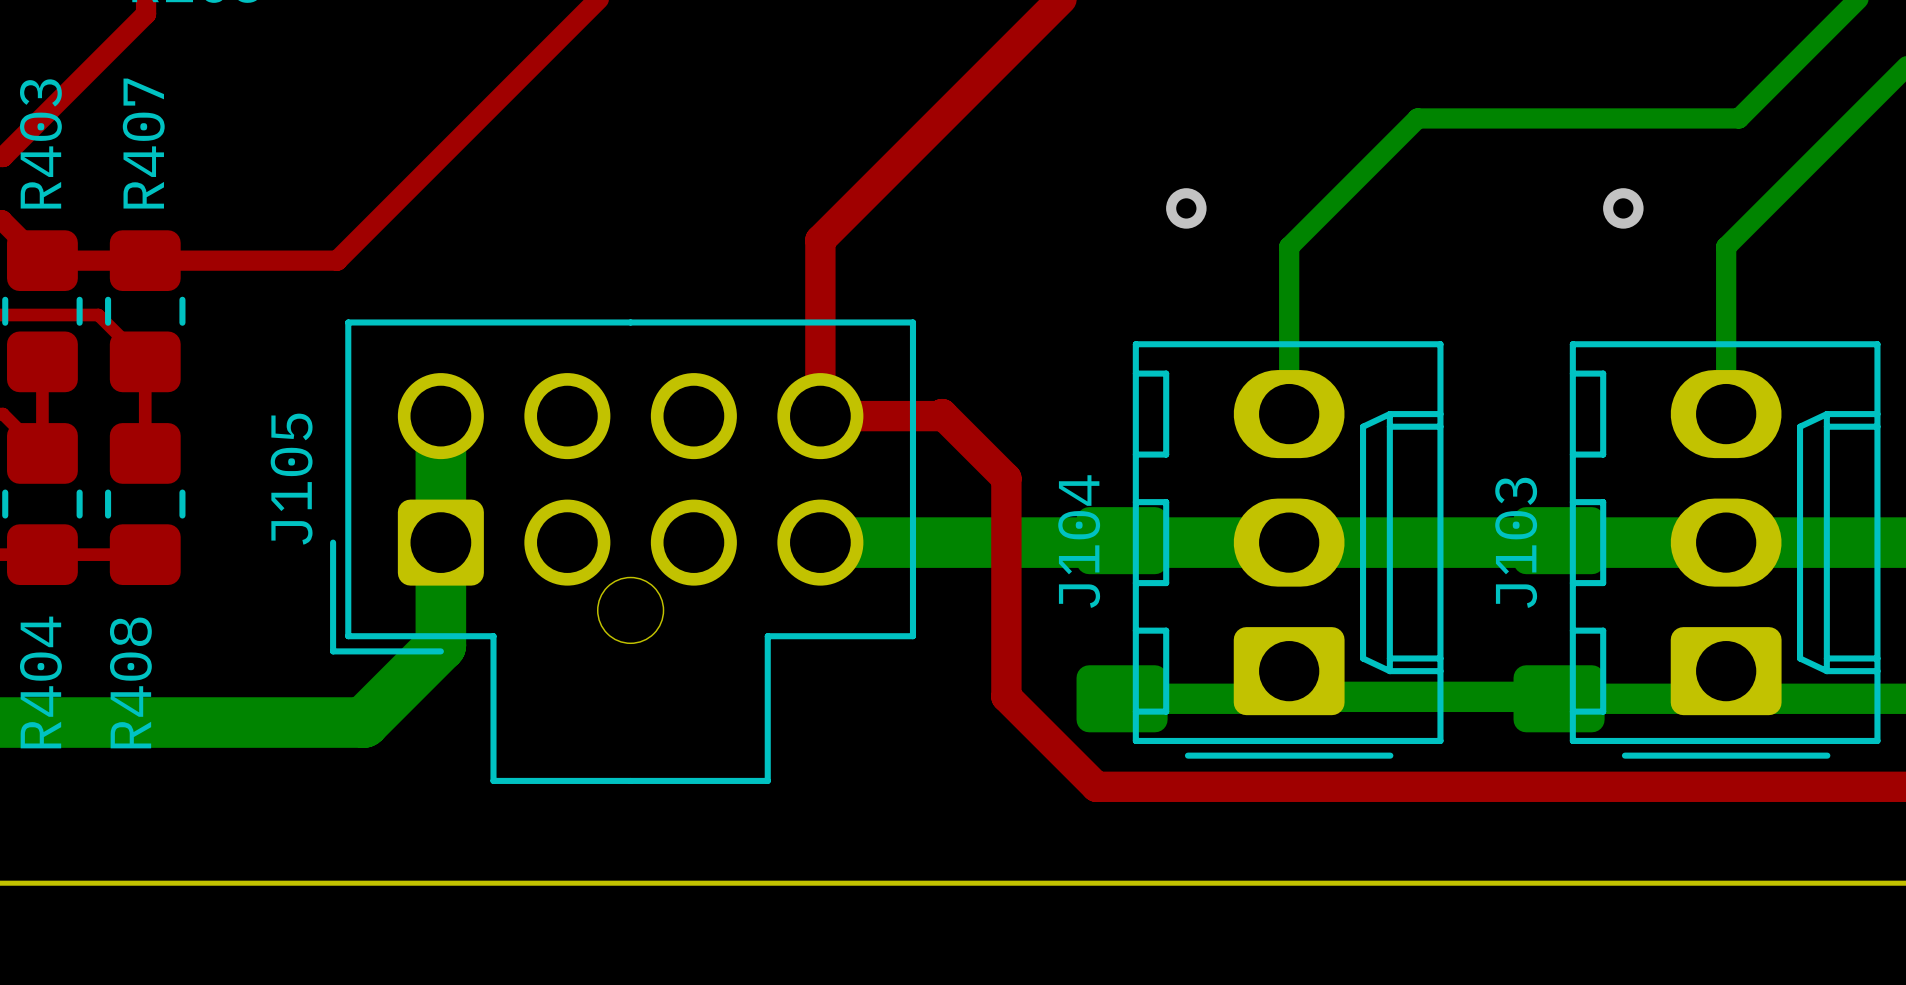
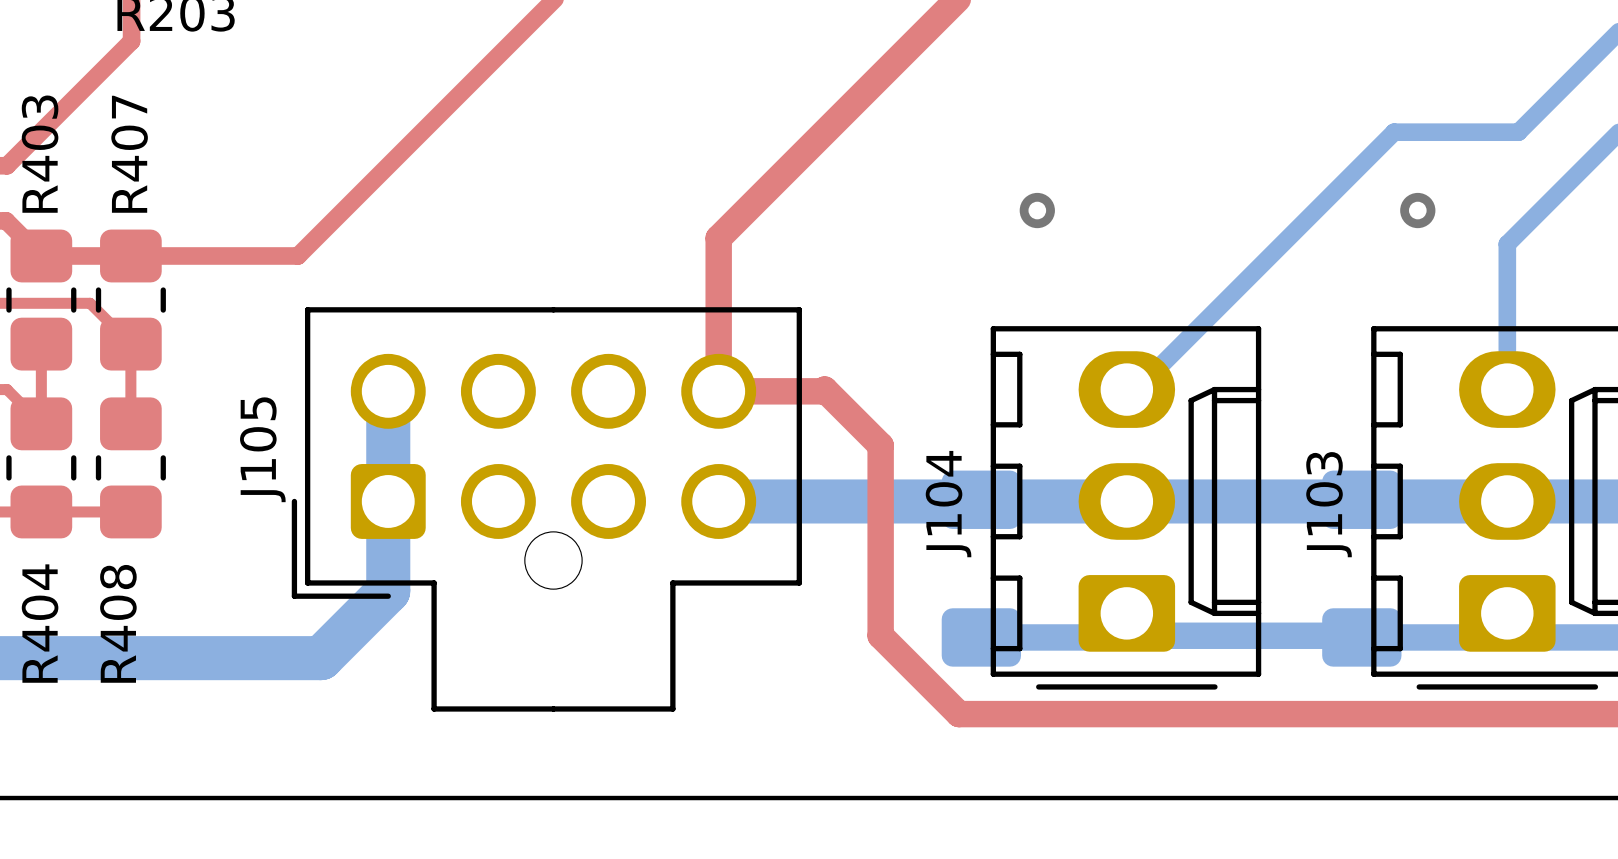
bottom track: (1596, 118) (1417, 118) (1289, 246) (1289, 414) -> (1394, 132) (1136, 389) (1126, 389)

